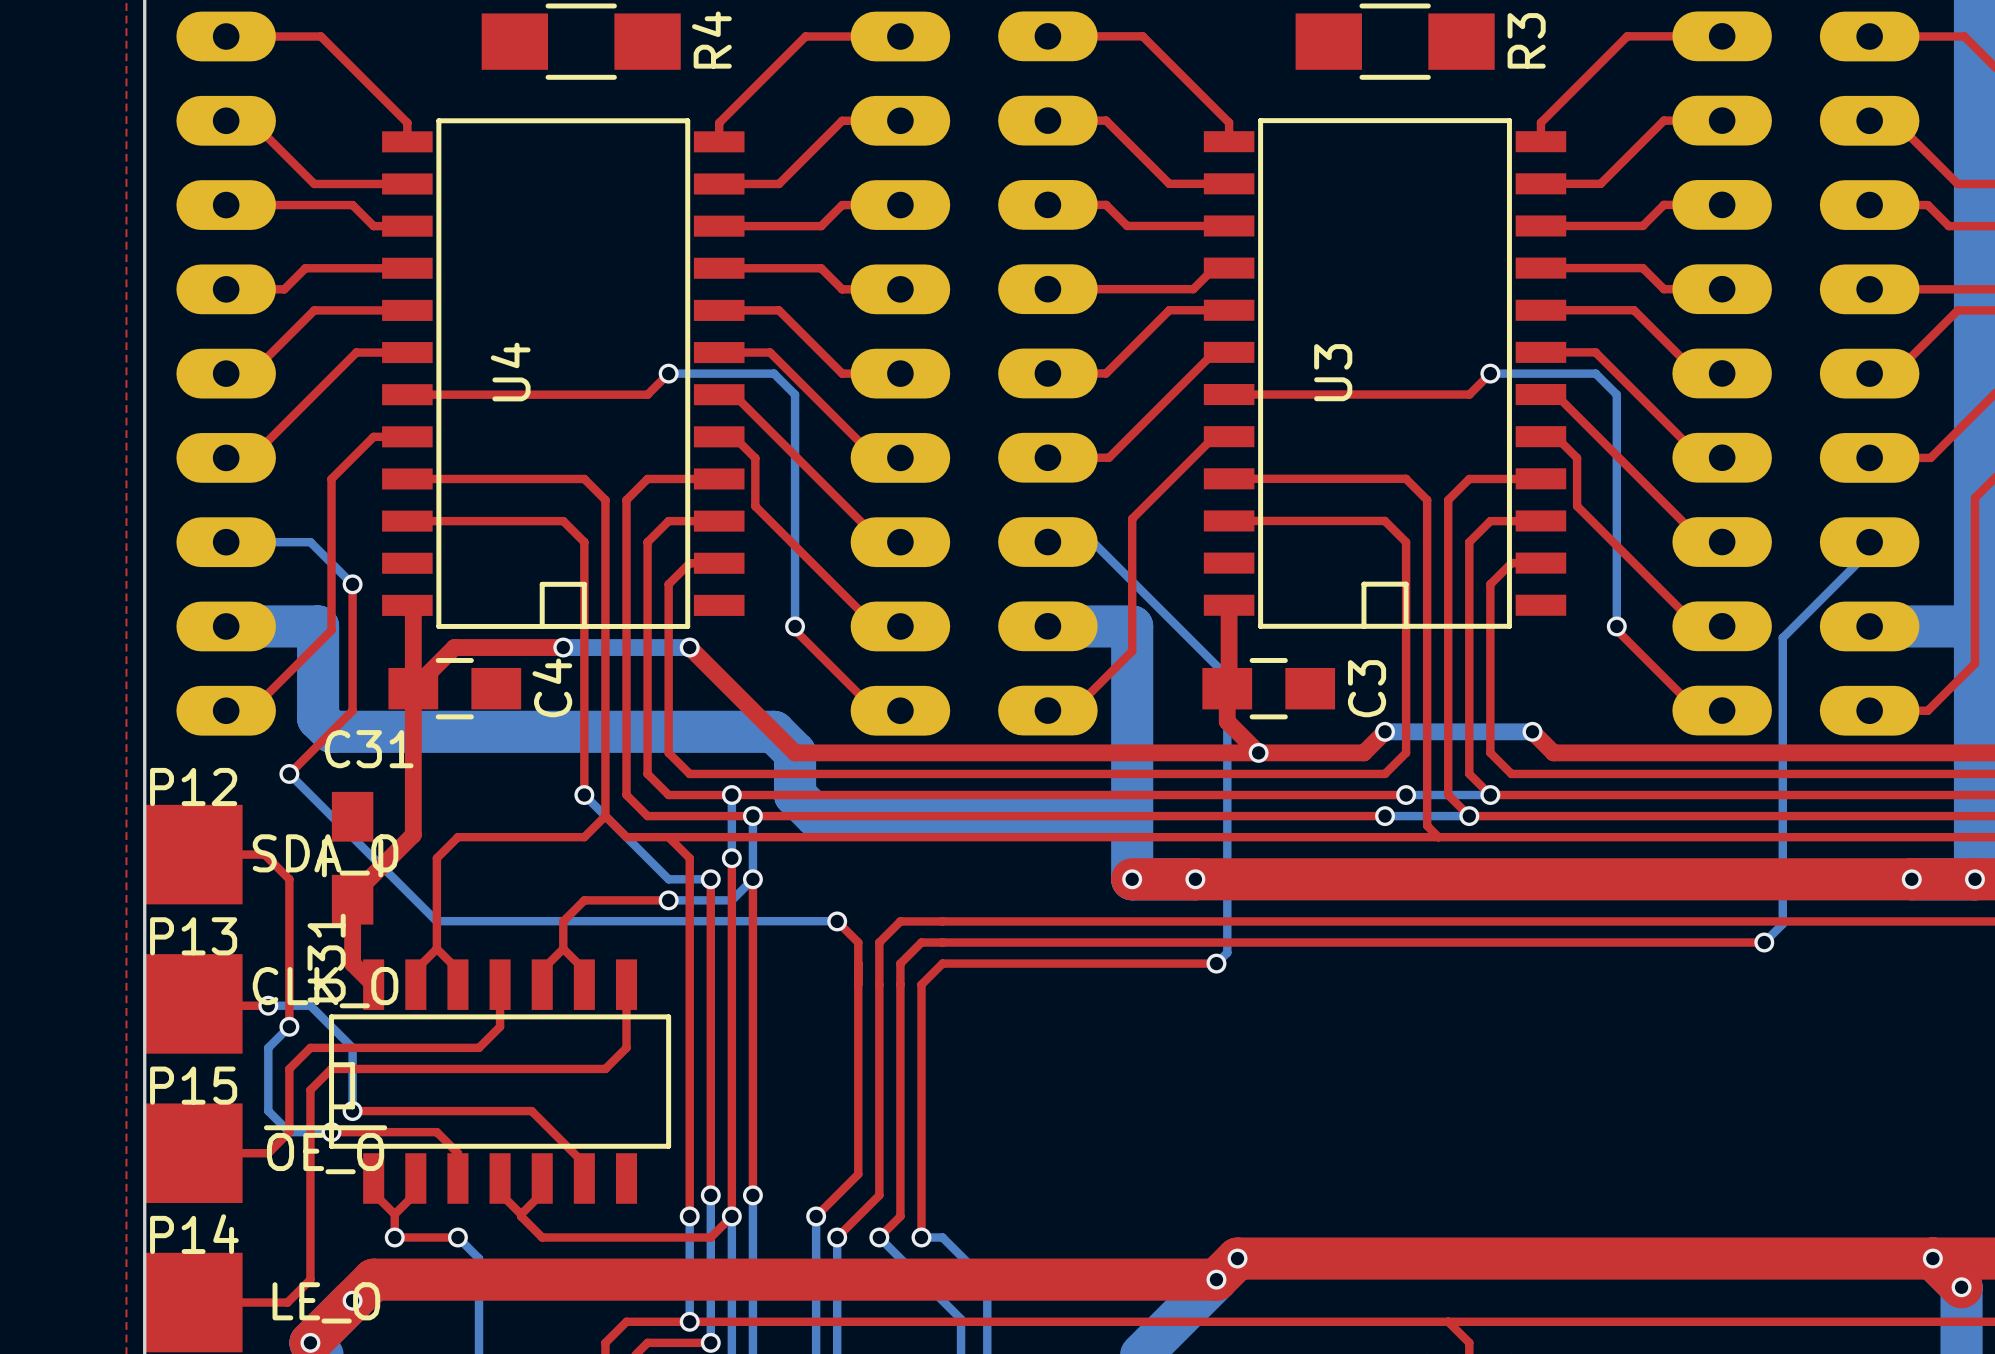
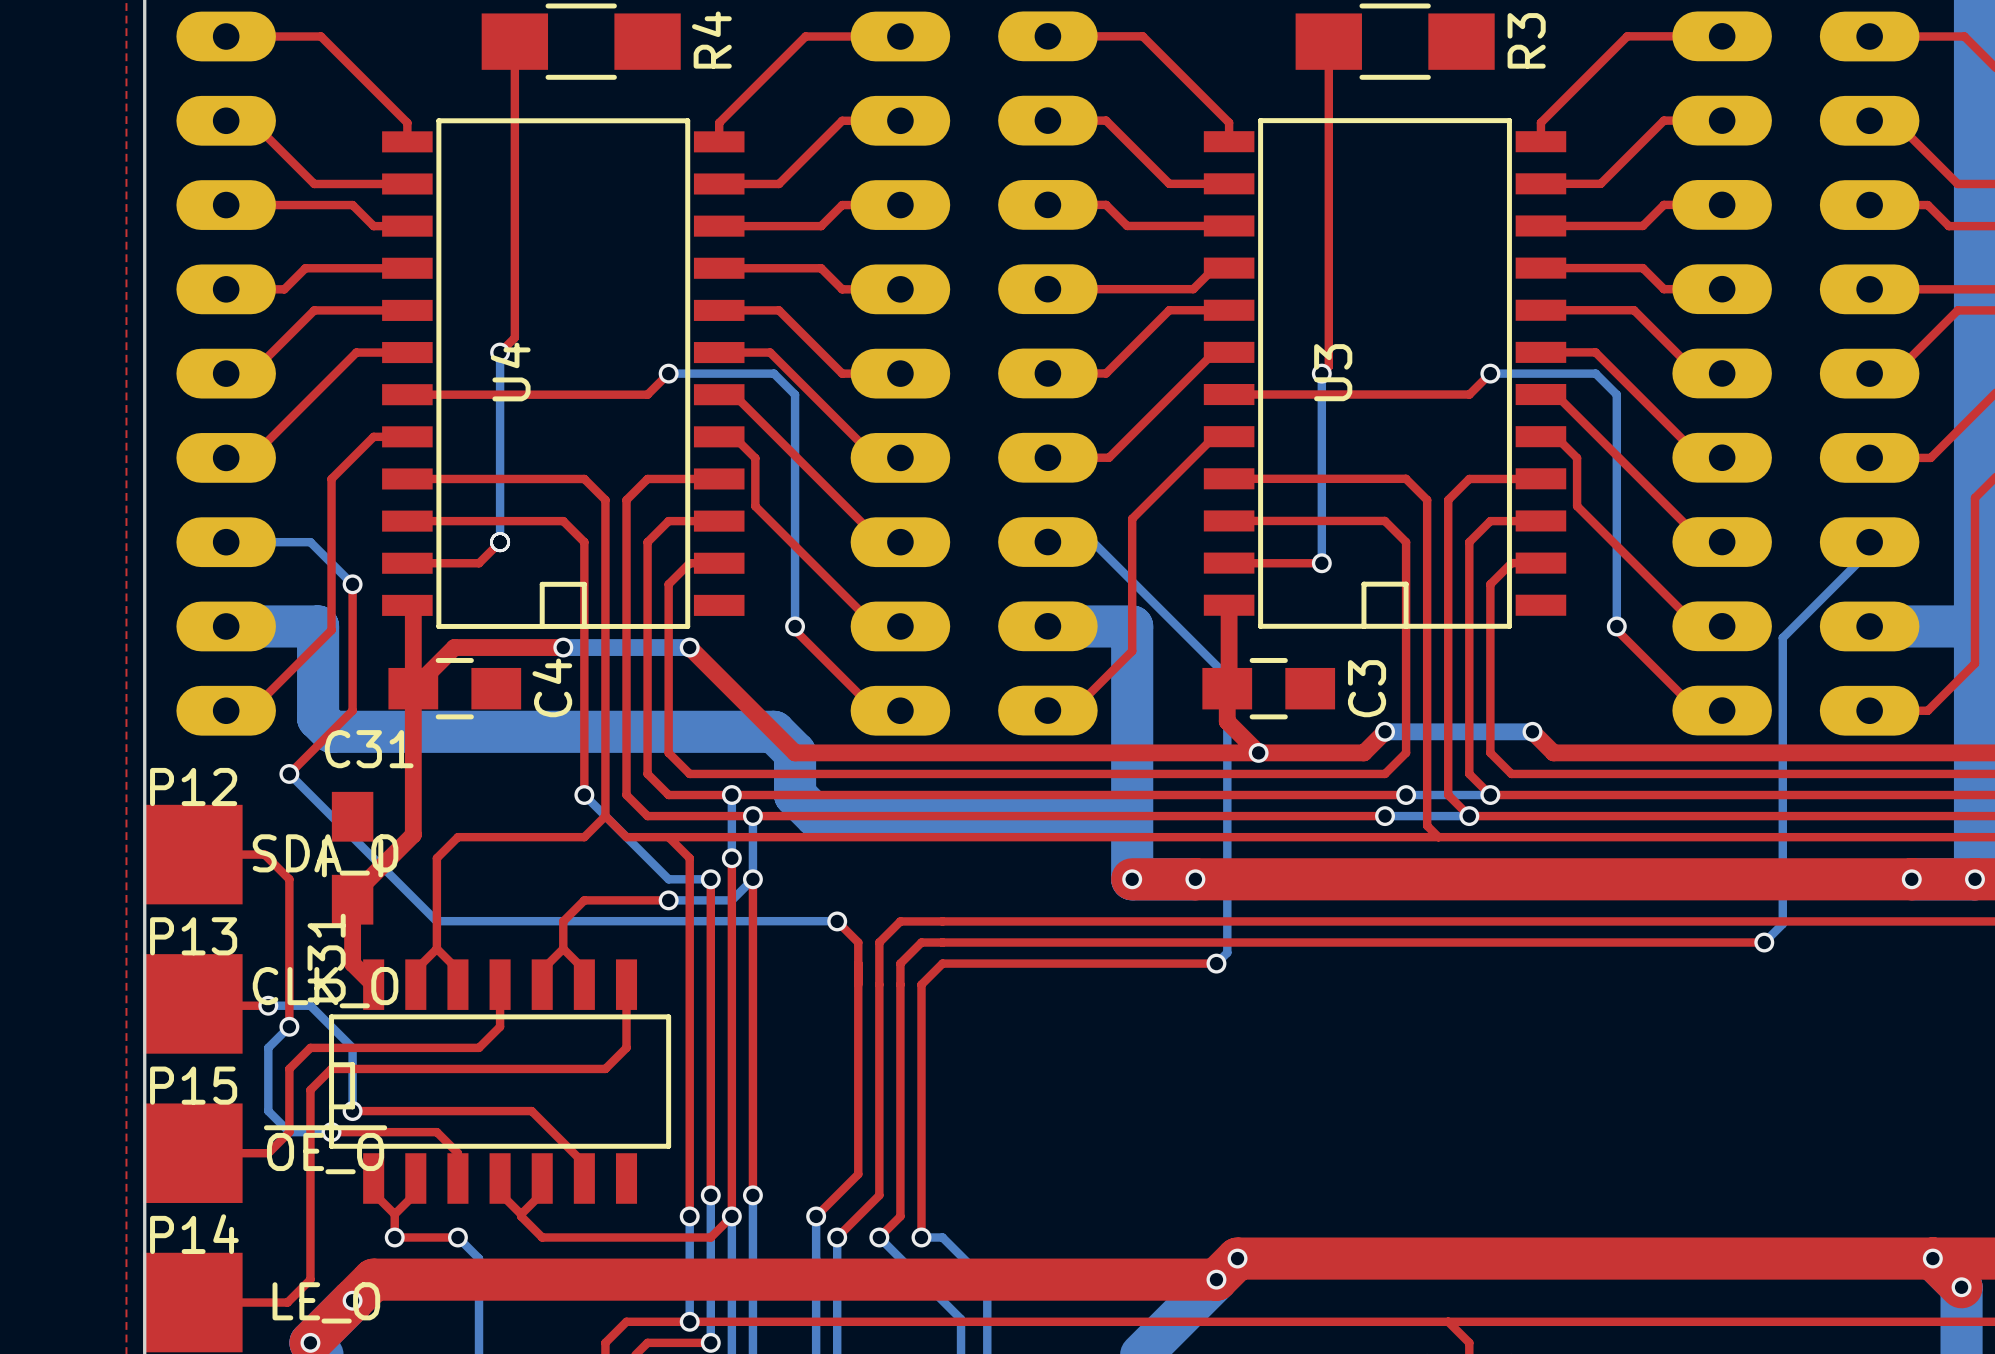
top track: none -> (514, 41) (514, 337) (500, 352)
top track: none -> (1328, 41) (1328, 366) (1321, 373)
bottom track: none -> (500, 352) (500, 542)
via: none -> (500, 352)
bottom track: none -> (1321, 373) (1321, 563)
via: none -> (1321, 373)
top track: none -> (500, 542) (479, 563) (407, 563)
via: none -> (500, 542)
top track: none -> (1229, 563) (1321, 563)
via: none -> (1321, 563)

